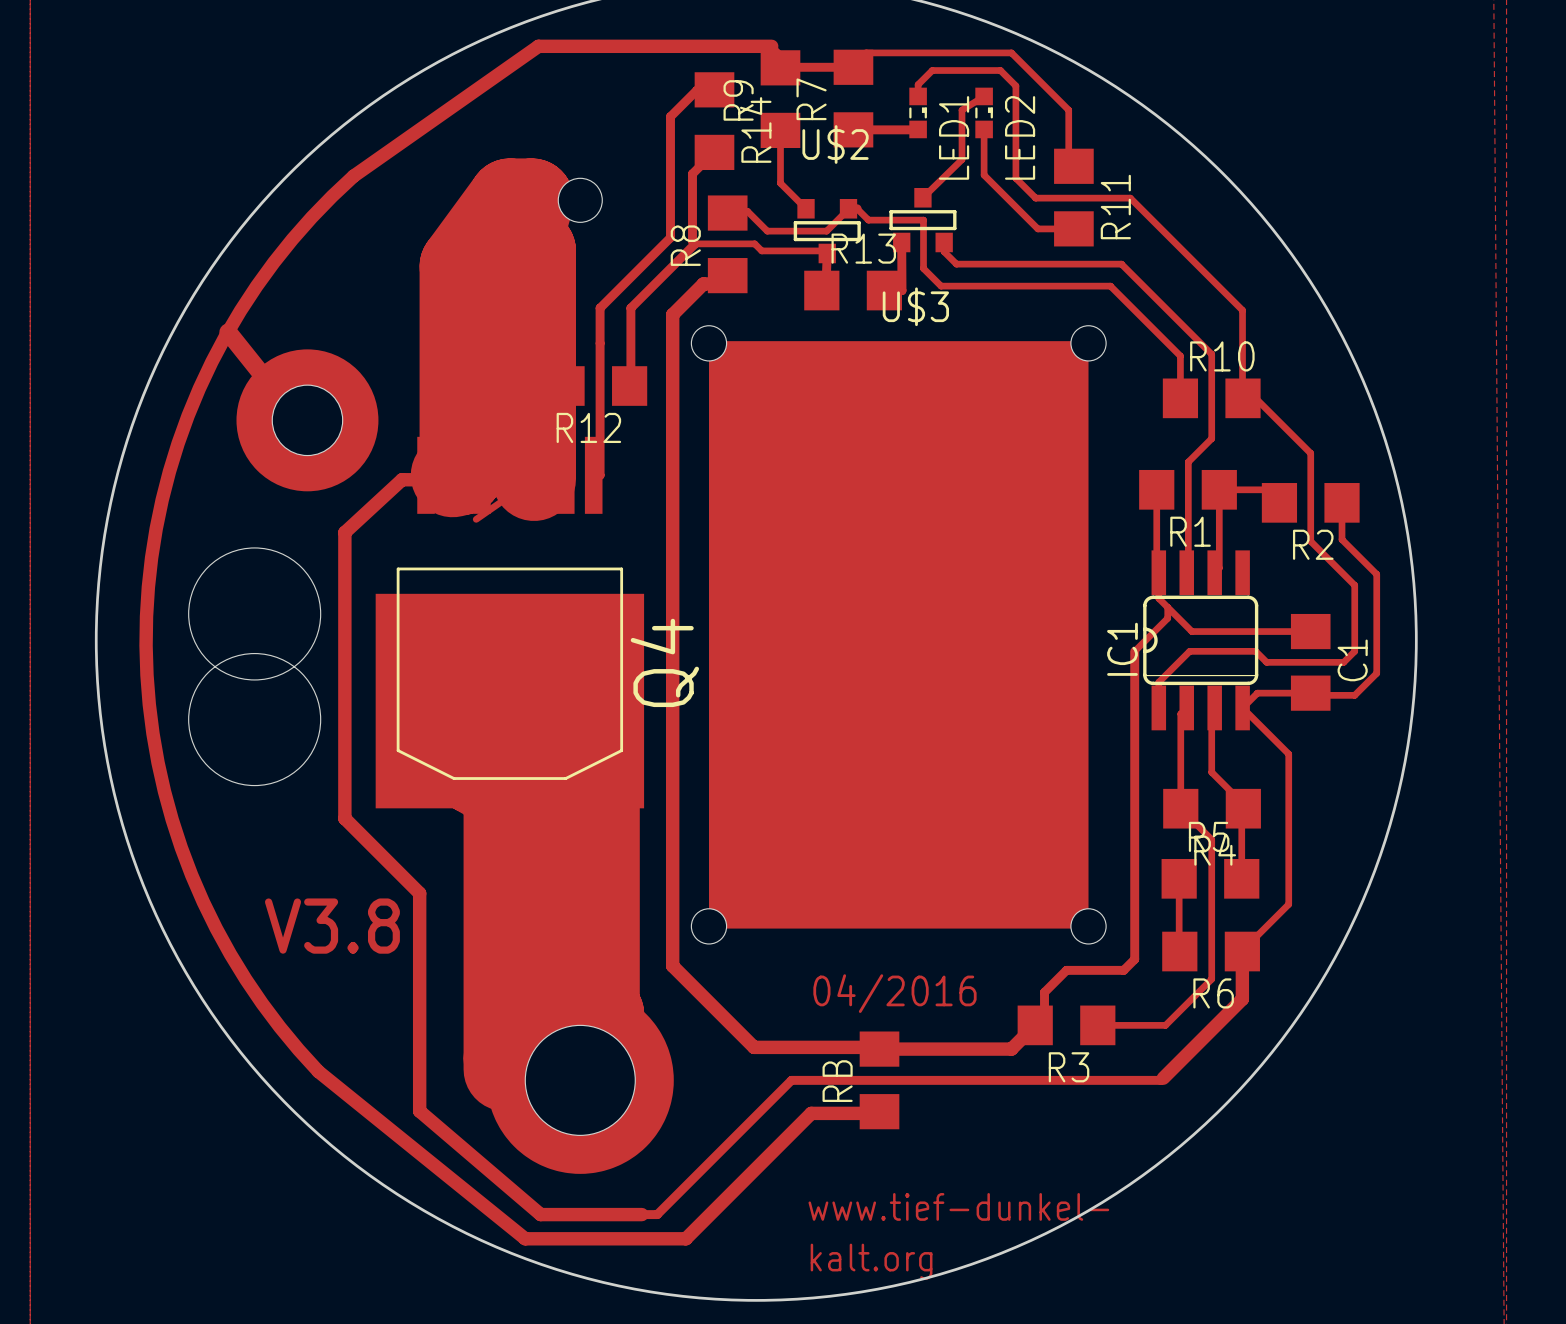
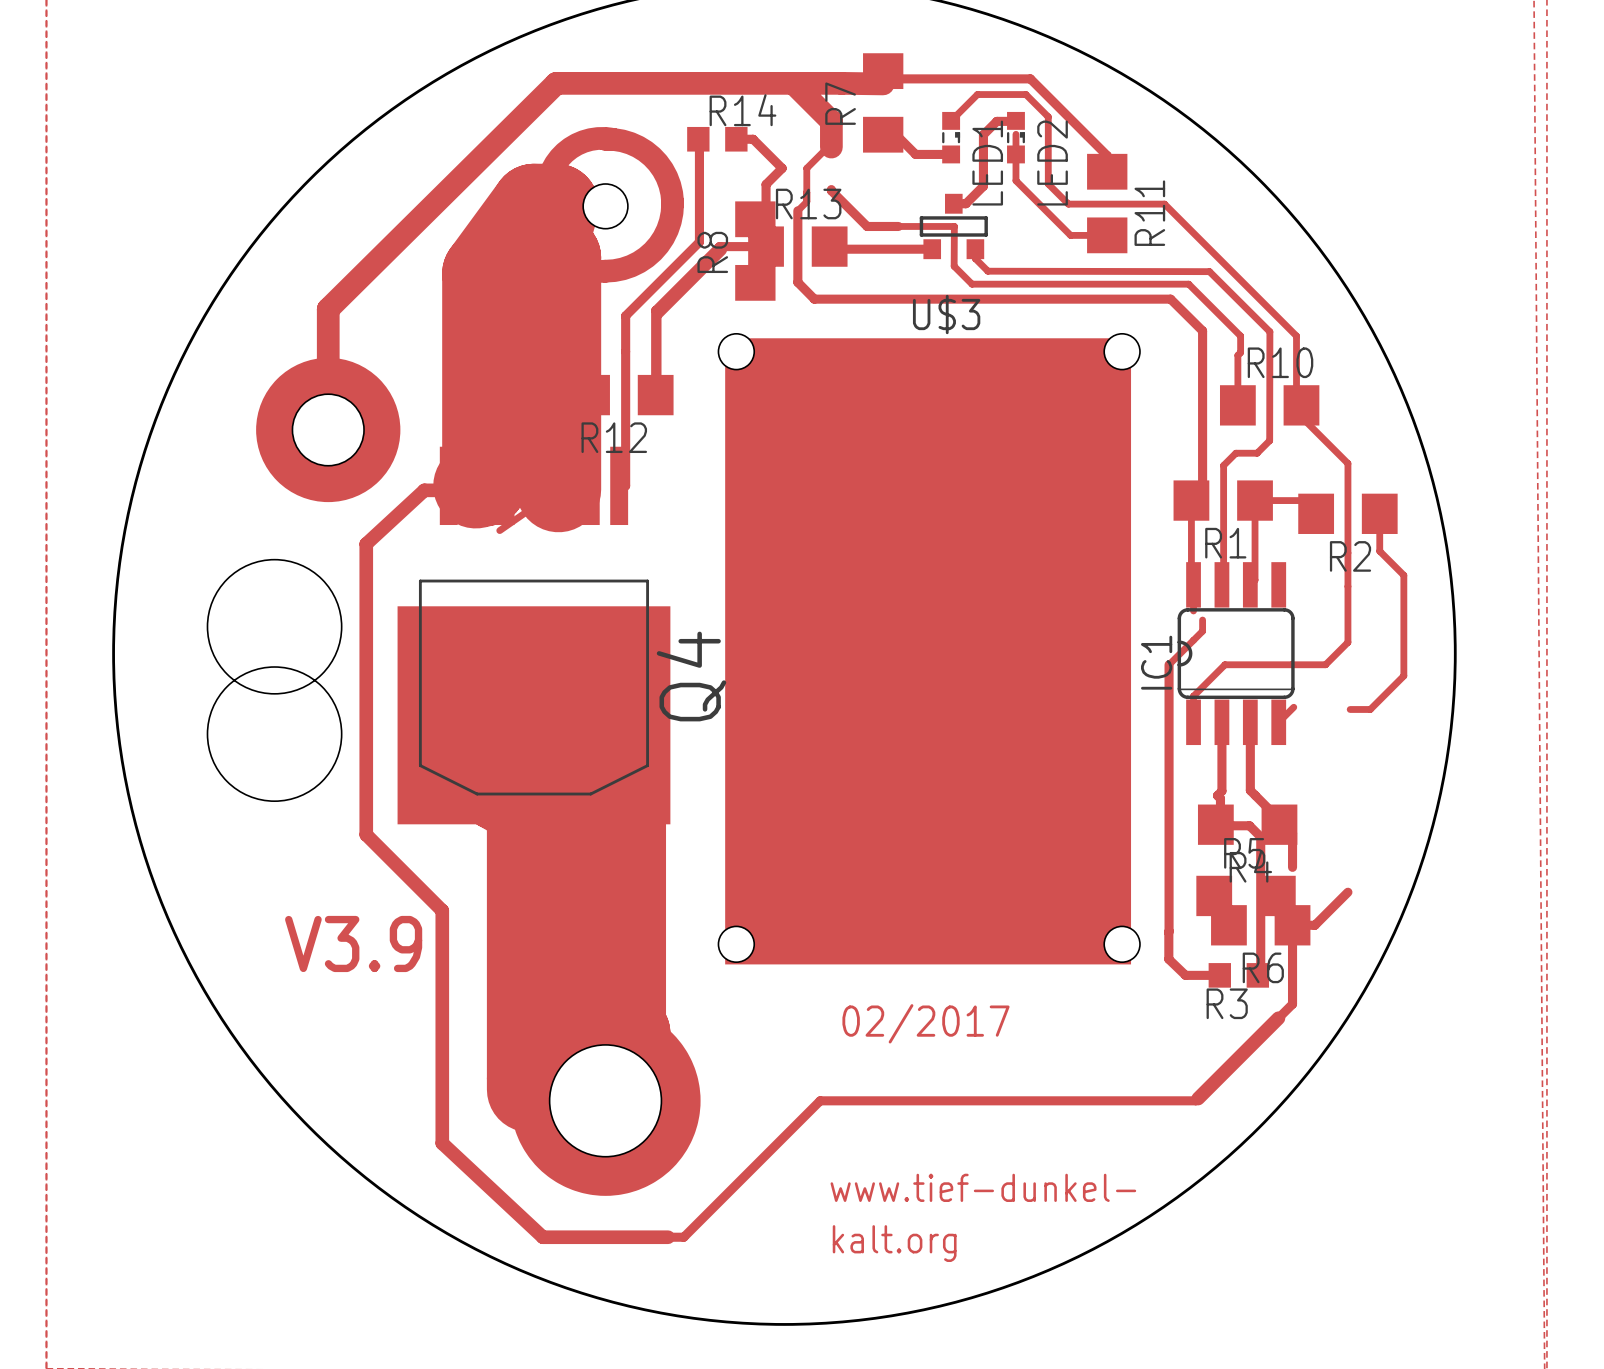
track: (791, 66) (771, 46) (538, 46) (353, 176) (332, 196) (273, 262) (240, 310) (199, 388) (178, 443) (162, 500) (148, 587) (146, 645) (149, 704) (164, 791) (191, 875) (230, 954) (262, 1003) (318, 1071) (525, 1238) (685, 1238) (811, 1113) (877, 1113) (879, 1111) -> none
track: (781, 67) (844, 67) (844, 79) -> none
track: (853, 67) (853, 59) (838, 59) (866, 52) (1011, 52) (1068, 110) (1068, 162) (1073, 166) -> none
R14 footprint: [694, 72, 735, 171] -> [687, 126, 748, 152]
track: none -> (793, 83) (831, 121) (831, 147) (828, 147) (806, 168) (806, 201) (797, 210) (797, 282) (814, 299) (1170, 299) (1202, 330) (1202, 500) (1191, 500)
track: (714, 89) (696, 90) (670, 116) (670, 237) -> (699, 148) (699, 242) (697, 244)
track: (918, 96) (918, 84) (932, 70) (1000, 70) (1015, 85) (1015, 112) -> (951, 120) (977, 94) (1025, 94) (1048, 116)
track: (984, 96) (962, 110) (962, 159) (922, 197) -> (1015, 120) (996, 121) (983, 134) (983, 186) (965, 203) (953, 203)
R9: (780, 99) -> none
LED1 position: (918, 112) -> (951, 137)
LED2 position: (984, 112) -> (1015, 137)
track: none -> (883, 121) (915, 154) (951, 154)
R14 name position: R14 (755, 129) -> R14 (742, 110)
track: (918, 129) (853, 129) -> none
track: (780, 130) (780, 183) (806, 208) -> none
track: none -> (736, 139) (753, 139) (782, 168) (766, 184) (766, 246) (719, 246) (655, 310) (655, 395)
track: (714, 152) (692, 173) (692, 241) (695, 243) (754, 243) (761, 250) (824, 250) (827, 253) (826, 279) (821, 290) -> none
track: none -> (1108, 170) (1107, 171) (1107, 155) (1030, 78) (888, 78) (883, 83) (556, 83) (328, 309) (328, 429)
track: none -> (556, 206) (547, 183) (555, 163) (570, 148) (583, 141) (597, 138) (630, 143) (652, 156) (666, 177) (672, 201) (667, 229) (658, 244) (646, 257) (622, 268) (577, 273) (538, 287) (514, 302) (485, 331) (465, 368) (457, 409) (460, 451) (474, 490)
track: (727, 213) (729, 211) (747, 211) (767, 231) (826, 231) (848, 208) (857, 208) (868, 220) -> (831, 189) (867, 226) (898, 226)
track: (923, 220) (923, 268) (941, 286) (1110, 286) (1180, 356) (1180, 398) -> (954, 226) (954, 266) (972, 284) (1188, 284) (1240, 336) (1240, 352) (1237, 355) (1237, 405)
U$2: (827, 231) -> none
track: (901, 242) (901, 290) (884, 290) -> (932, 249) (832, 249) (829, 246)
track: (956, 264) (1121, 264) (1211, 354) (1211, 438) (1188, 462) -> (987, 271) (1209, 271) (1269, 331) (1269, 440) (1257, 453) (1235, 453) (1223, 465) (1223, 472)
track: (727, 275) (717, 283) (703, 283) (672, 314) (672, 965) (754, 1047) (883, 1047) (882, 1049) -> none
R13 position: (853, 290) -> (797, 246)
track: (1242, 310) (1242, 397) (1255, 398) -> (1278, 318) (1296, 336) (1296, 409) (1301, 405) (1292, 407)
track: (228, 332) (263, 376) -> none
drawing shape: [708, 341, 1089, 929] -> [725, 338, 1132, 965]
R10 position: (1211, 398) -> (1269, 405)
track: (1310, 541) (1354, 585) (1354, 651) (1343, 662) (1266, 662) (1255, 651) -> (1347, 552) (1347, 642) (1325, 664) (1292, 664)
track: (1365, 563) (1376, 574) (1376, 673) (1354, 695) (1332, 695) -> (1403, 575) (1403, 675) (1370, 709)
track: (1158, 598) (1191, 631) (1310, 631) (1297, 618) -> none
C1: (1310, 662) -> none
track: (1257, 693) (1310, 693) (1312, 695) -> none
track: (1186, 707) (1180, 713) (1180, 808) (1211, 839) (1211, 979) (1165, 1025) (1097, 1025) -> (1221, 722) (1221, 791) (1217, 795) (1220, 798) (1220, 814) (1231, 825) (1249, 825) (1260, 836) (1260, 972) (1257, 975)
track: (1214, 707) (1211, 710) (1211, 772) (1243, 803) (1241, 878) -> (1250, 722) (1250, 790) (1292, 832) (1292, 867)
track: (1242, 707) (1288, 754) (1288, 904) (1242, 950) (1242, 999) -> (1347, 892) (1314, 925) (1292, 925) (1292, 1004) (1278, 1018)
track: (1179, 878) (1179, 951) -> none
track: (1134, 913) (1134, 959) (1123, 970) (1066, 970) (1044, 992) (1044, 1016) (1011, 1049) (879, 1049) -> (1169, 930) (1168, 959) (1185, 975) (1219, 975)
text: V3.8 (332, 926) -> V3.9 (353, 943)
R6 position: (1211, 951) -> (1260, 925)
text: 04/2016 (894, 993) -> 02/2017 (925, 1023)
R3 footprint: [1017, 1005, 1116, 1046] -> [1208, 963, 1270, 988]
RB: (879, 1080) -> none
track: (419, 1111) (540, 1214) -> (442, 1132) (442, 1143) (542, 1237) (565, 1237)
text position: www.tief-dunkel- (958, 1206) -> www.tief-dunkel- (983, 1187)
text position: kalt.org (871, 1261) -> kalt.org (894, 1243)

